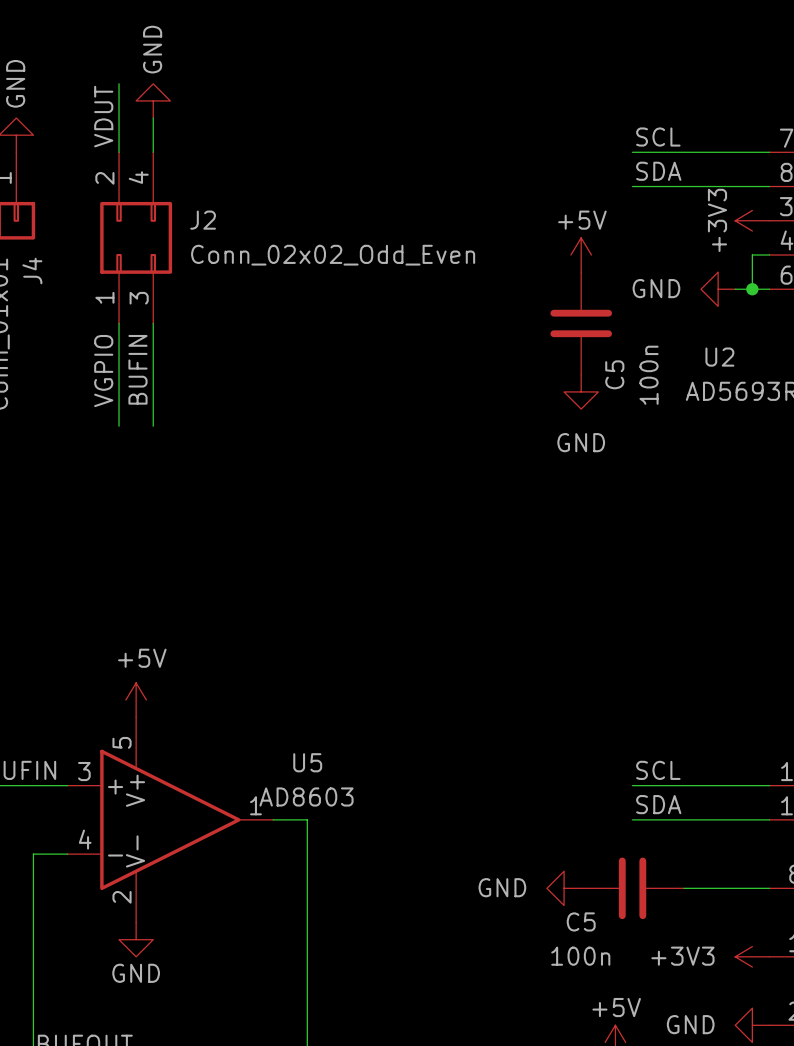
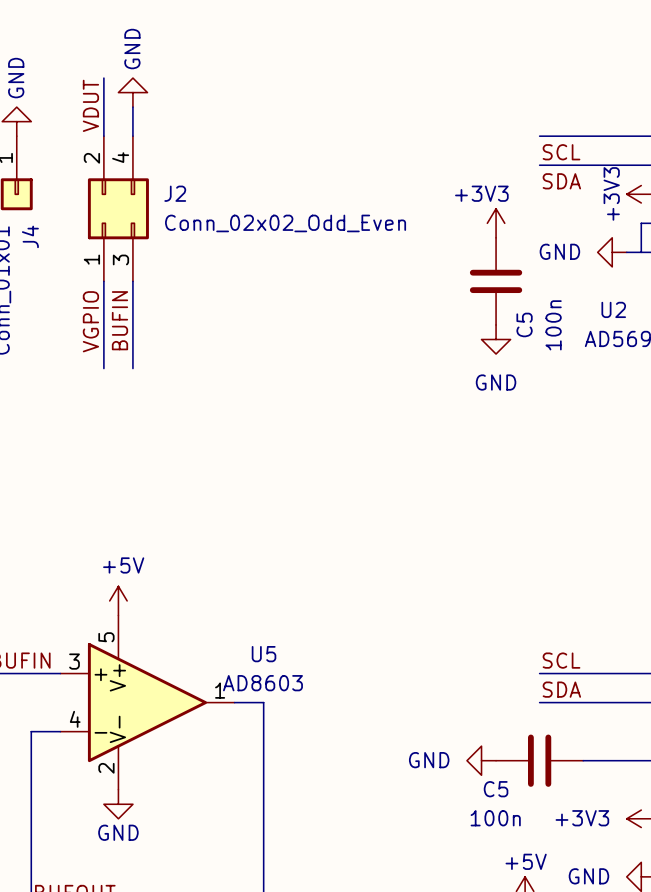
label: SCL (658, 137) -> none
label: SDA (658, 171) -> SCL (561, 152)
label: none -> SDA (561, 181)
power symbol: +5V (581, 255) -> +3V3 (496, 223)
junction: (752, 289) -> none

